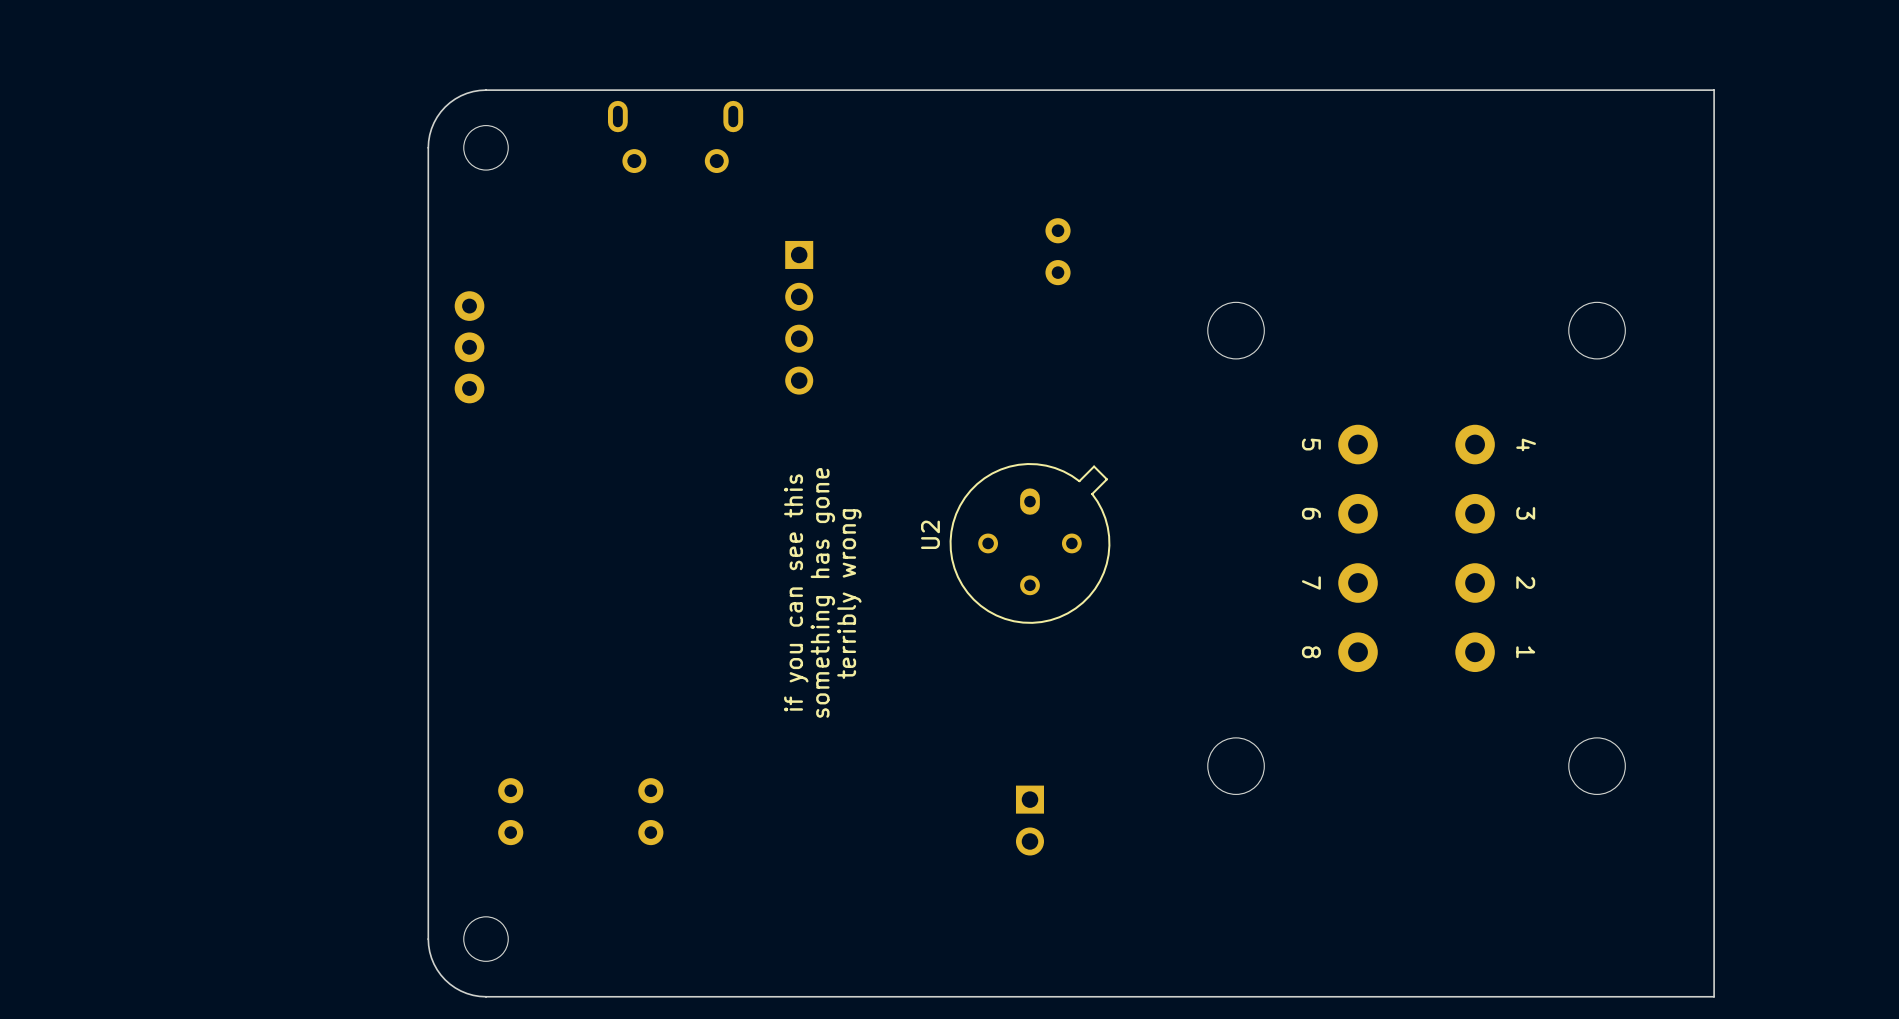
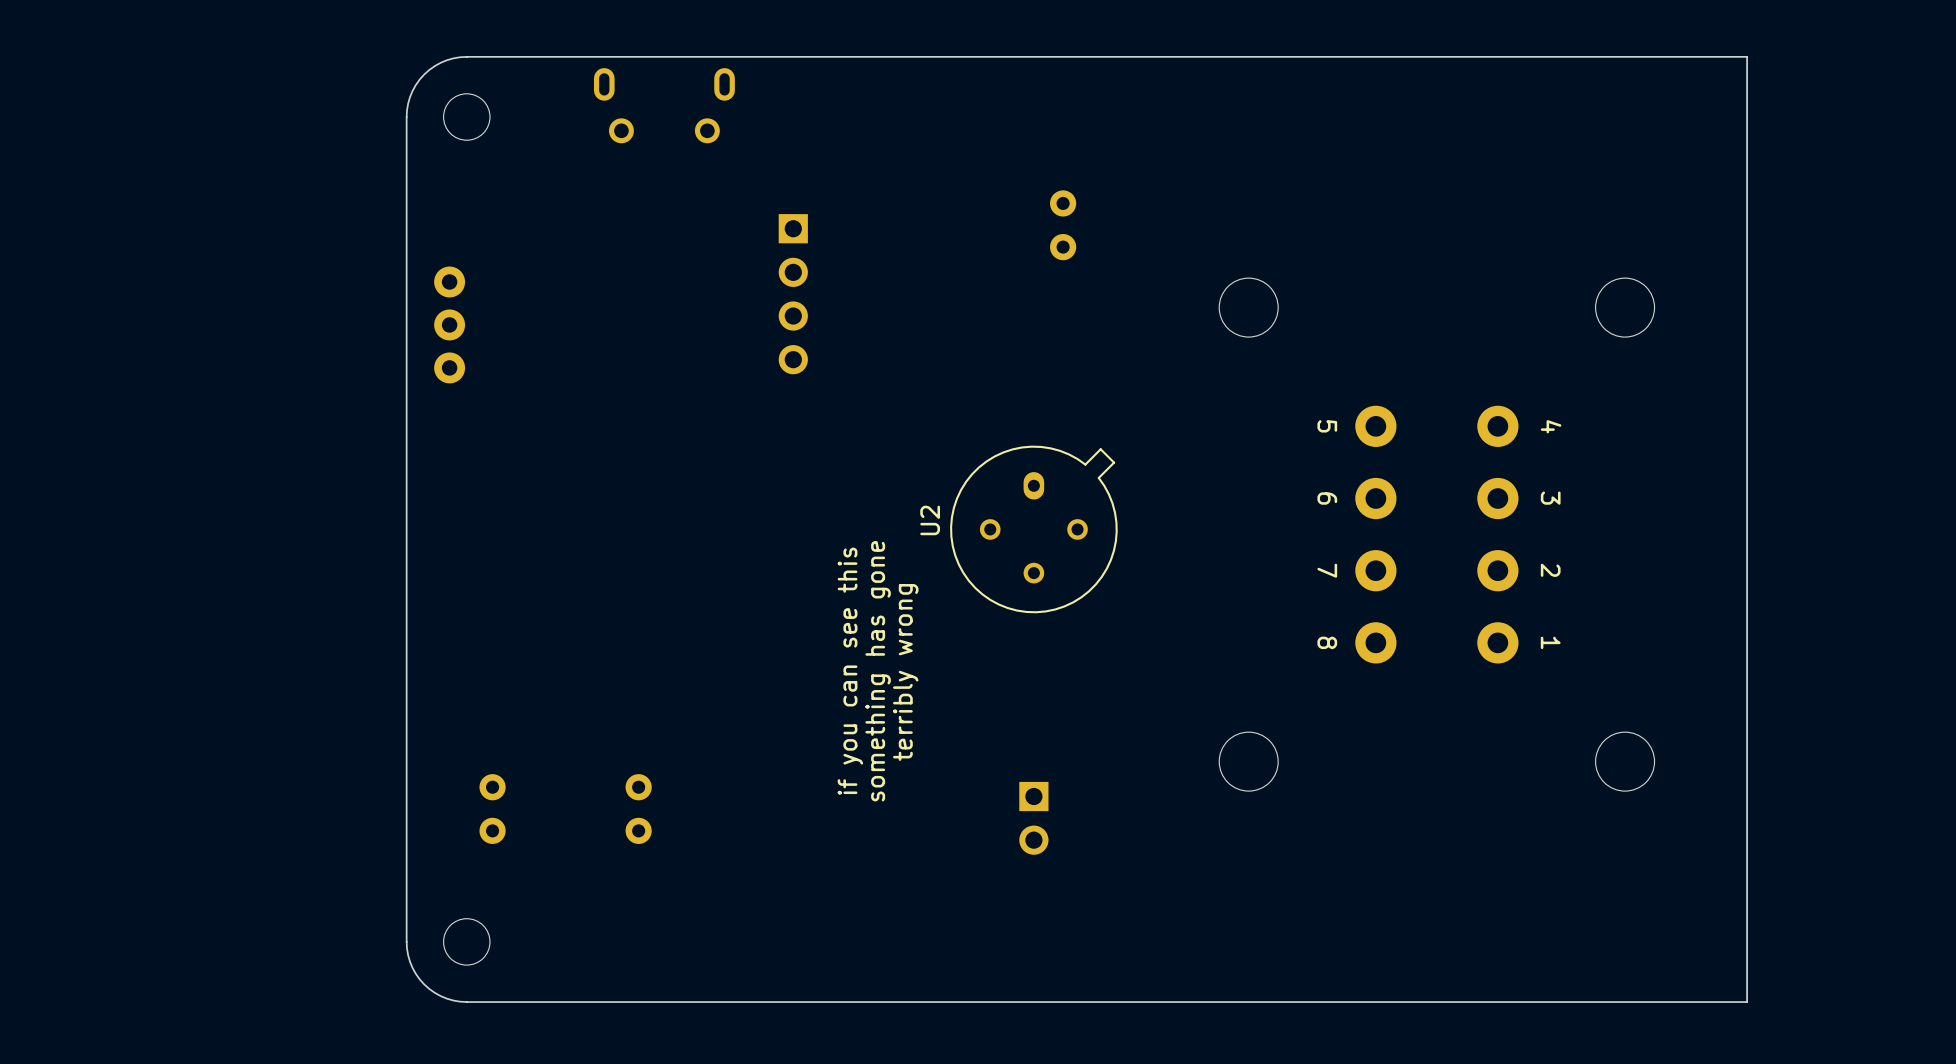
text position: if you can see this (796, 592) -> if you can see this (850, 671)
text position: something has gone (822, 592) -> something has gone (878, 671)
text position: terribly wrong (849, 594) -> terribly wrong (905, 672)

